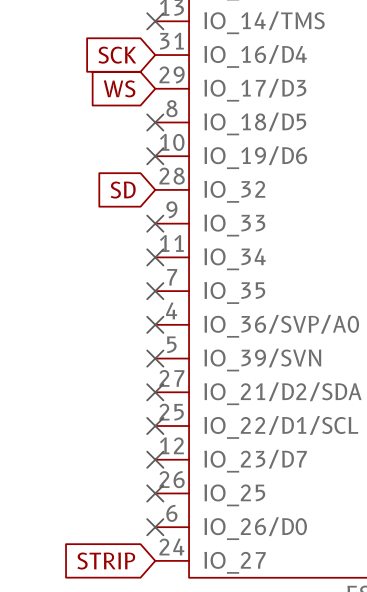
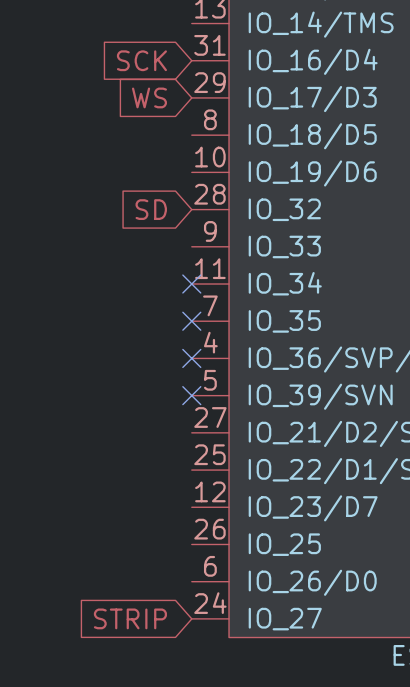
no-connect mark: (155, 21) -> none
no-connect mark: (155, 122) -> none
no-connect mark: (155, 156) -> none
no-connect mark: (155, 223) -> none
no-connect mark: (155, 392) -> none
no-connect mark: (155, 426) -> none
no-connect mark: (155, 459) -> none
no-connect mark: (155, 493) -> none
no-connect mark: (155, 527) -> none

